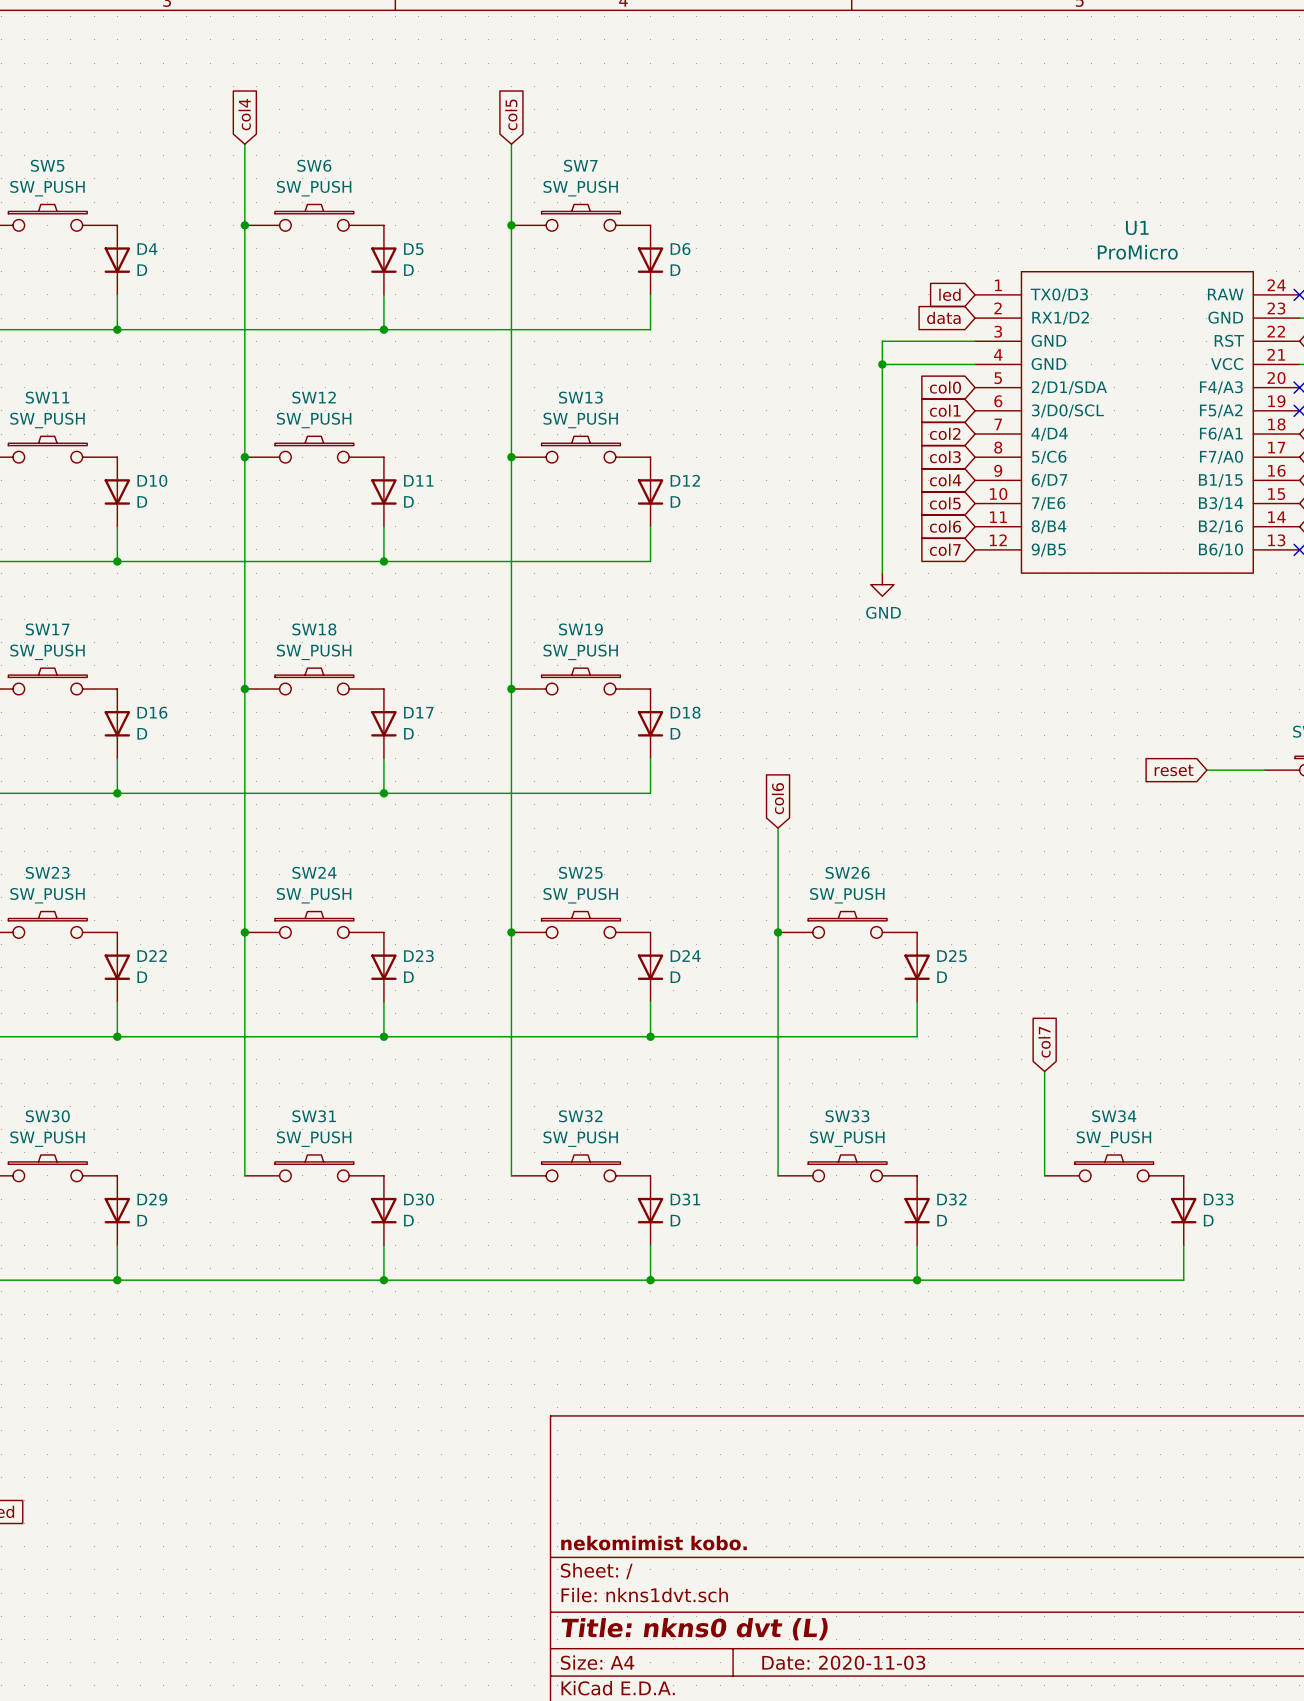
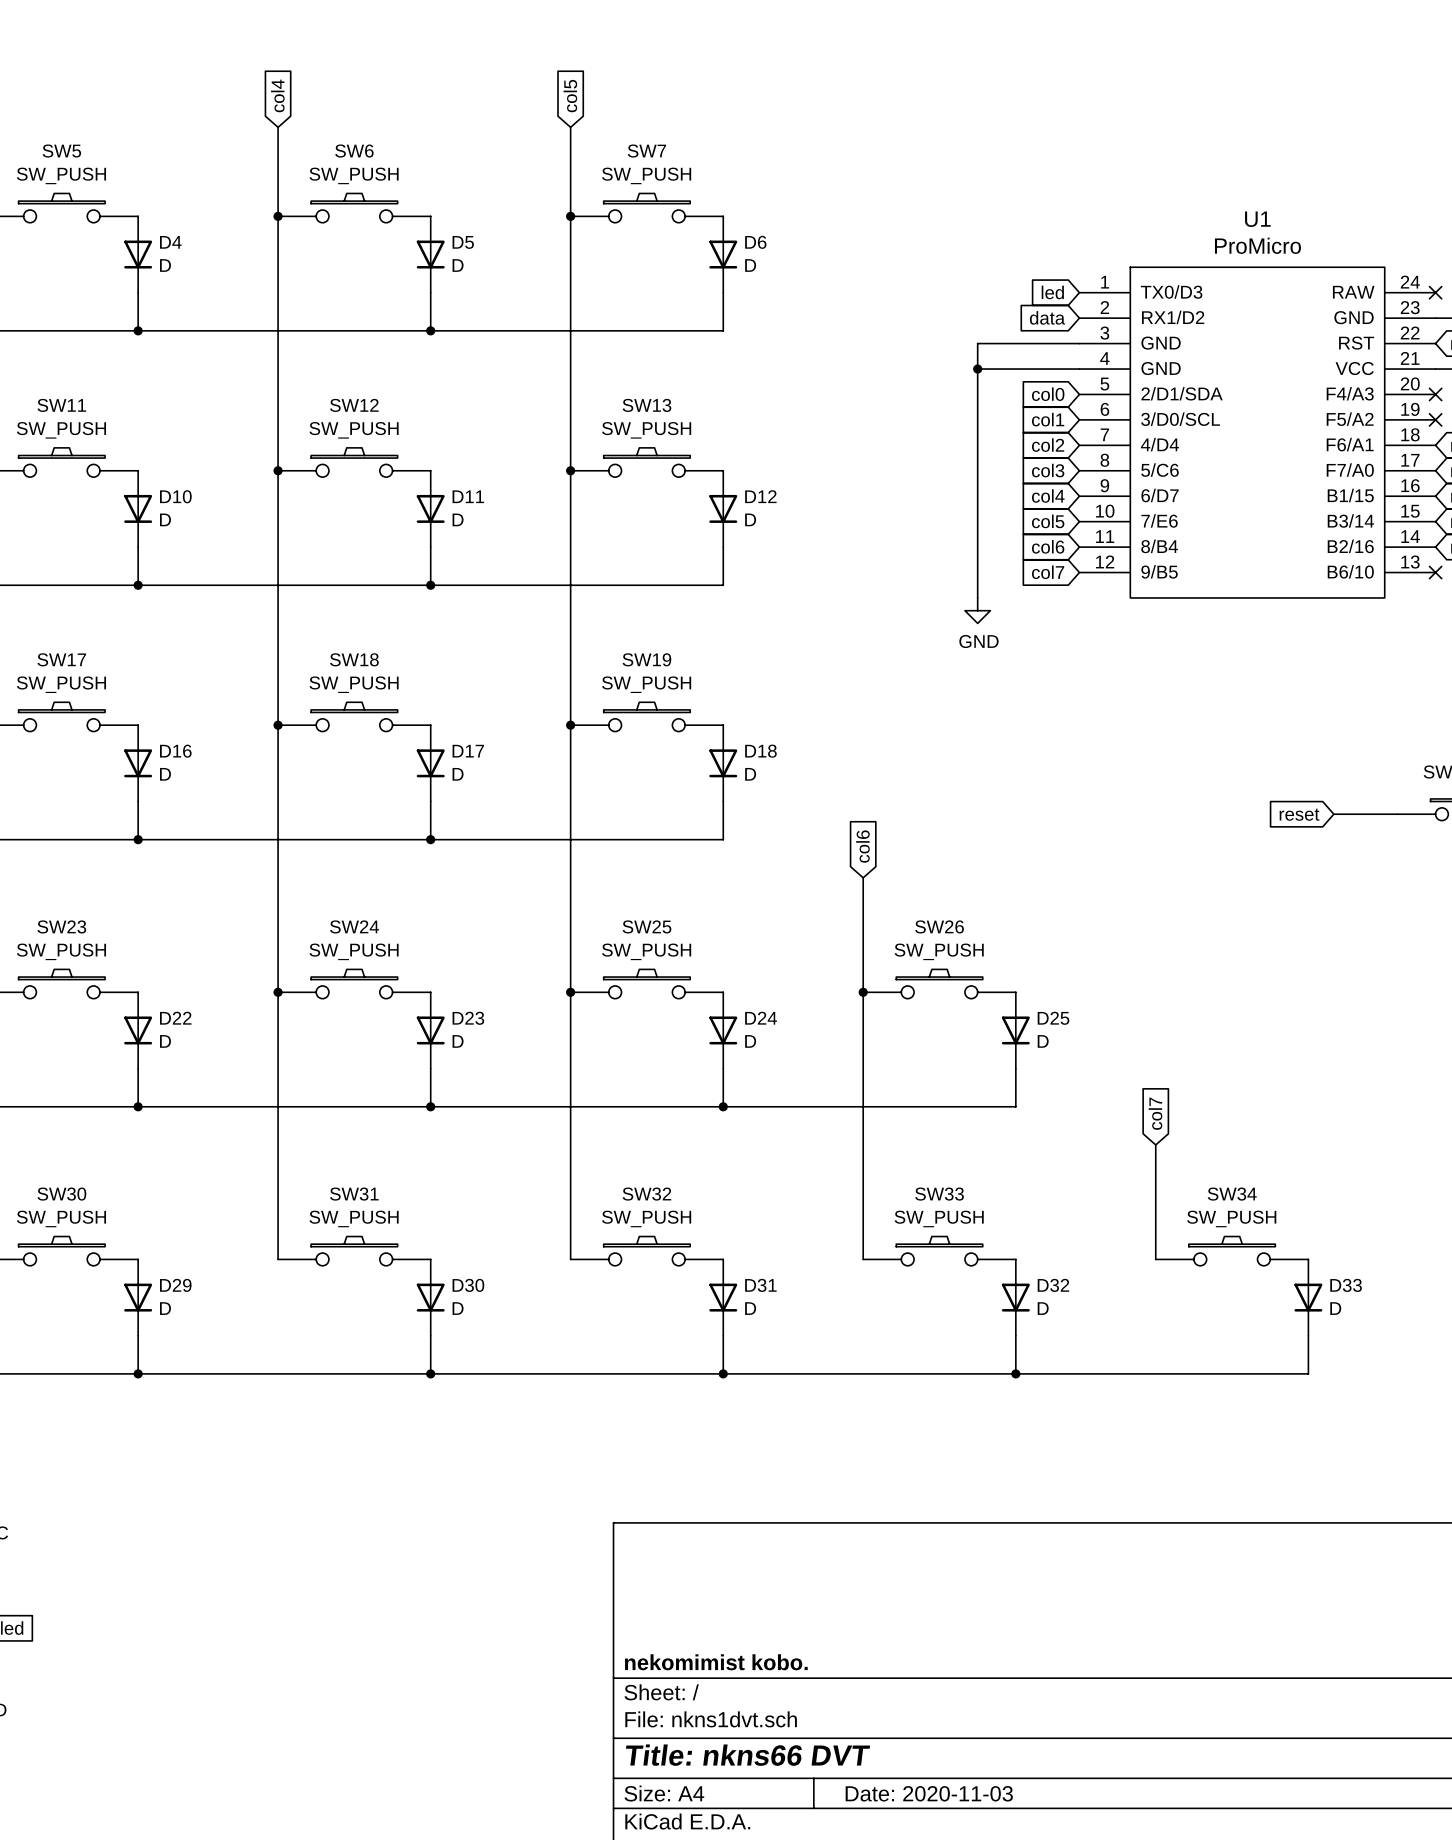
title block: Title: nkns0 dvt (L) (694, 1629) -> Title: nkns66 DVT (748, 1755)

